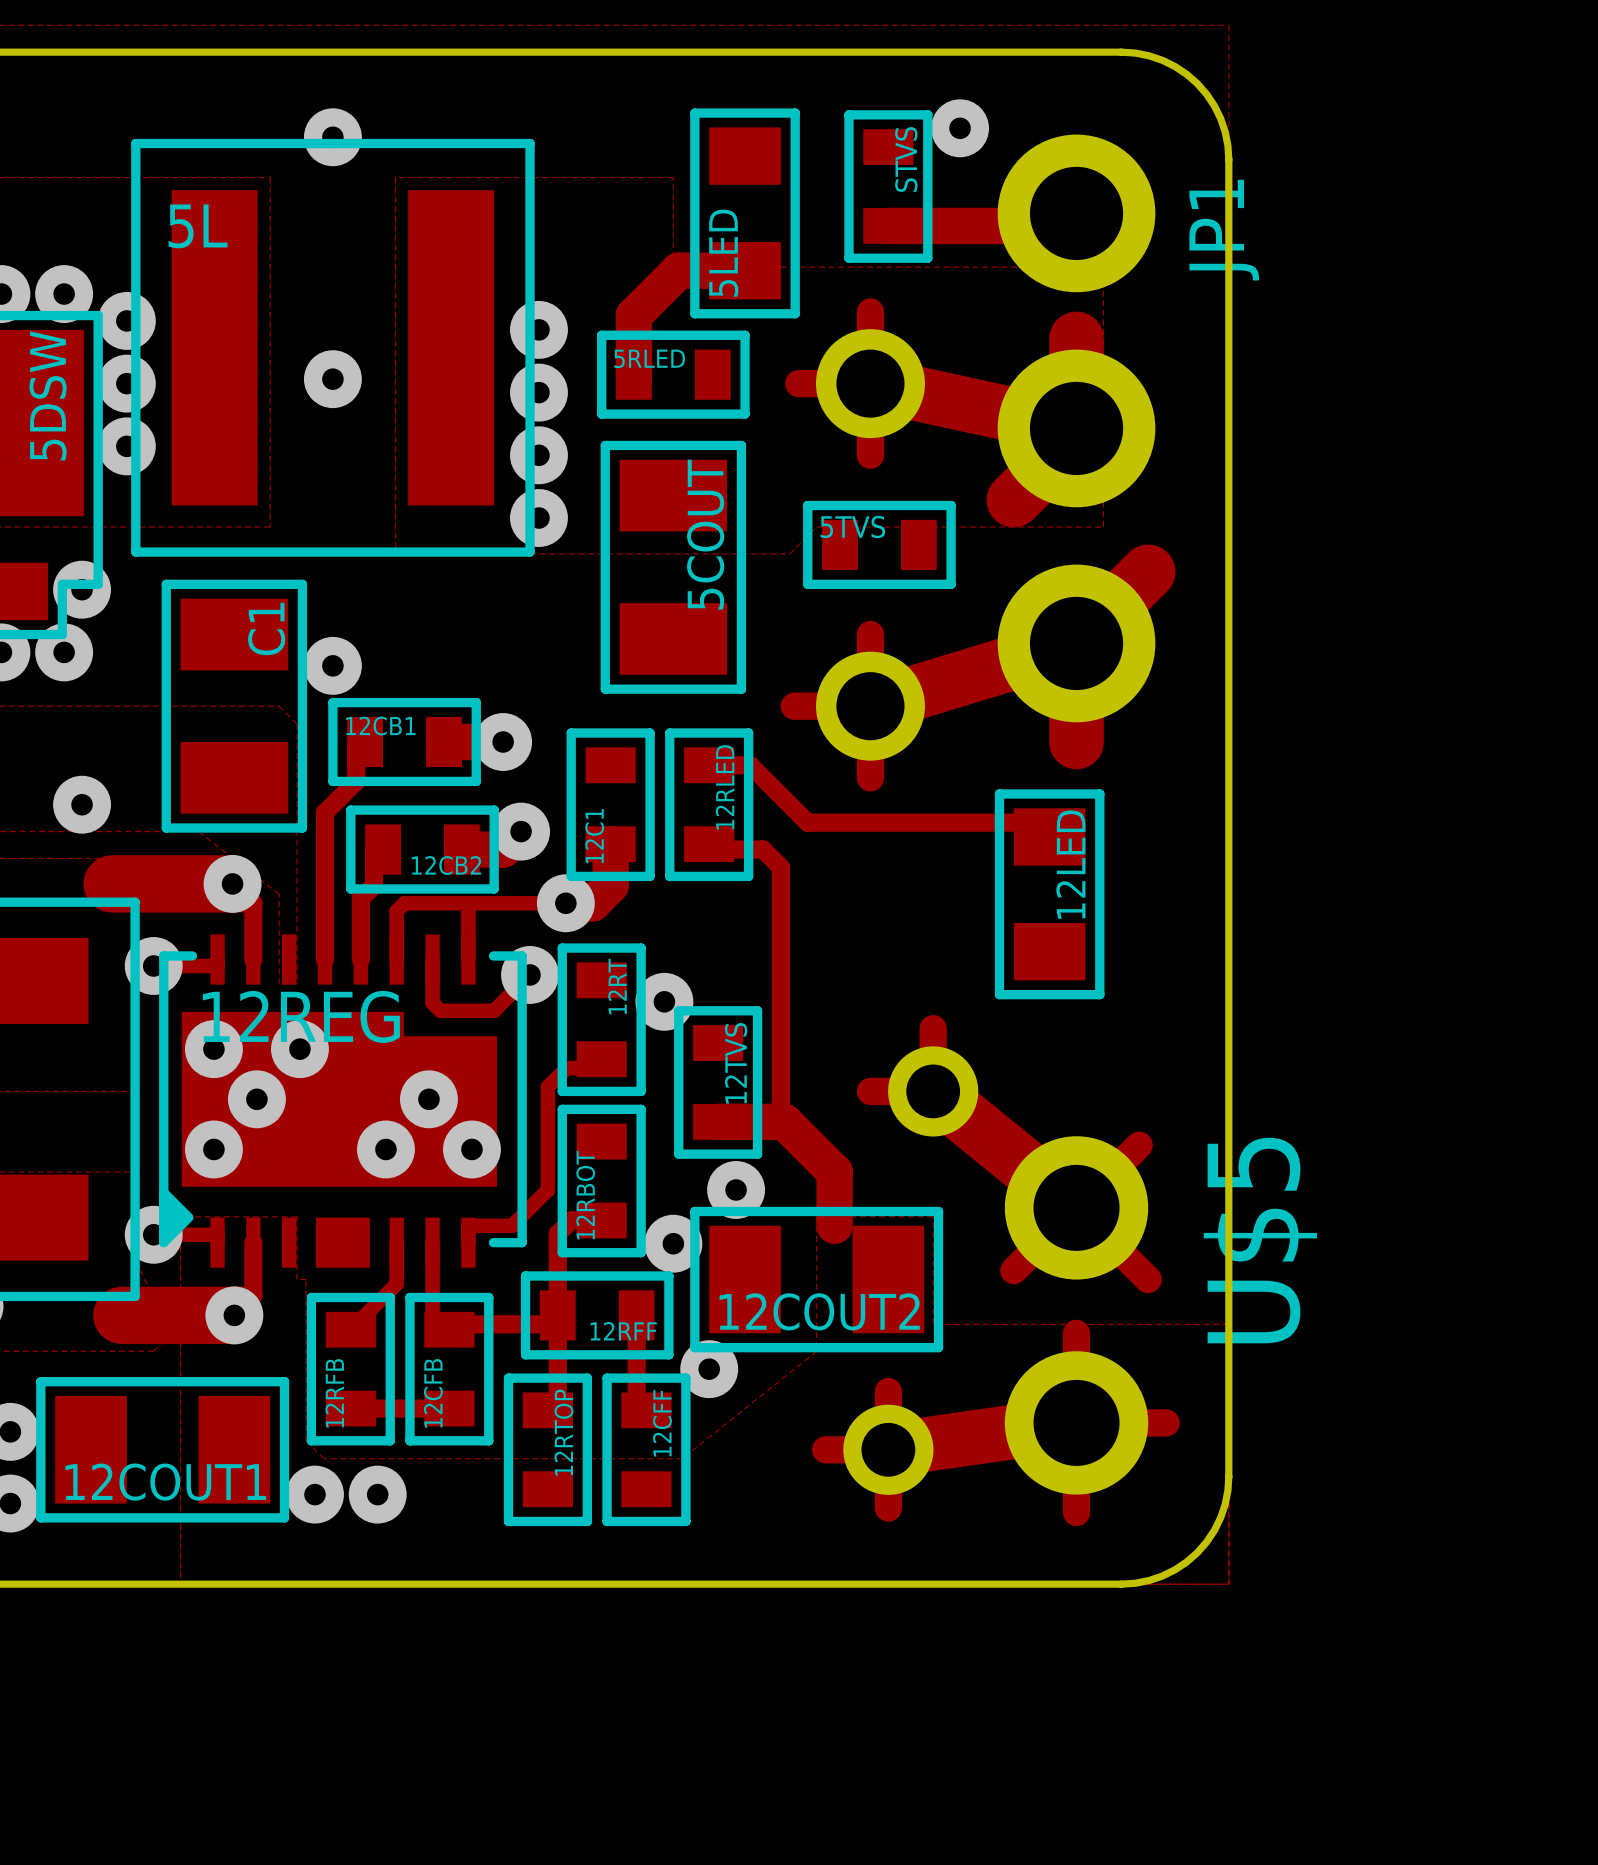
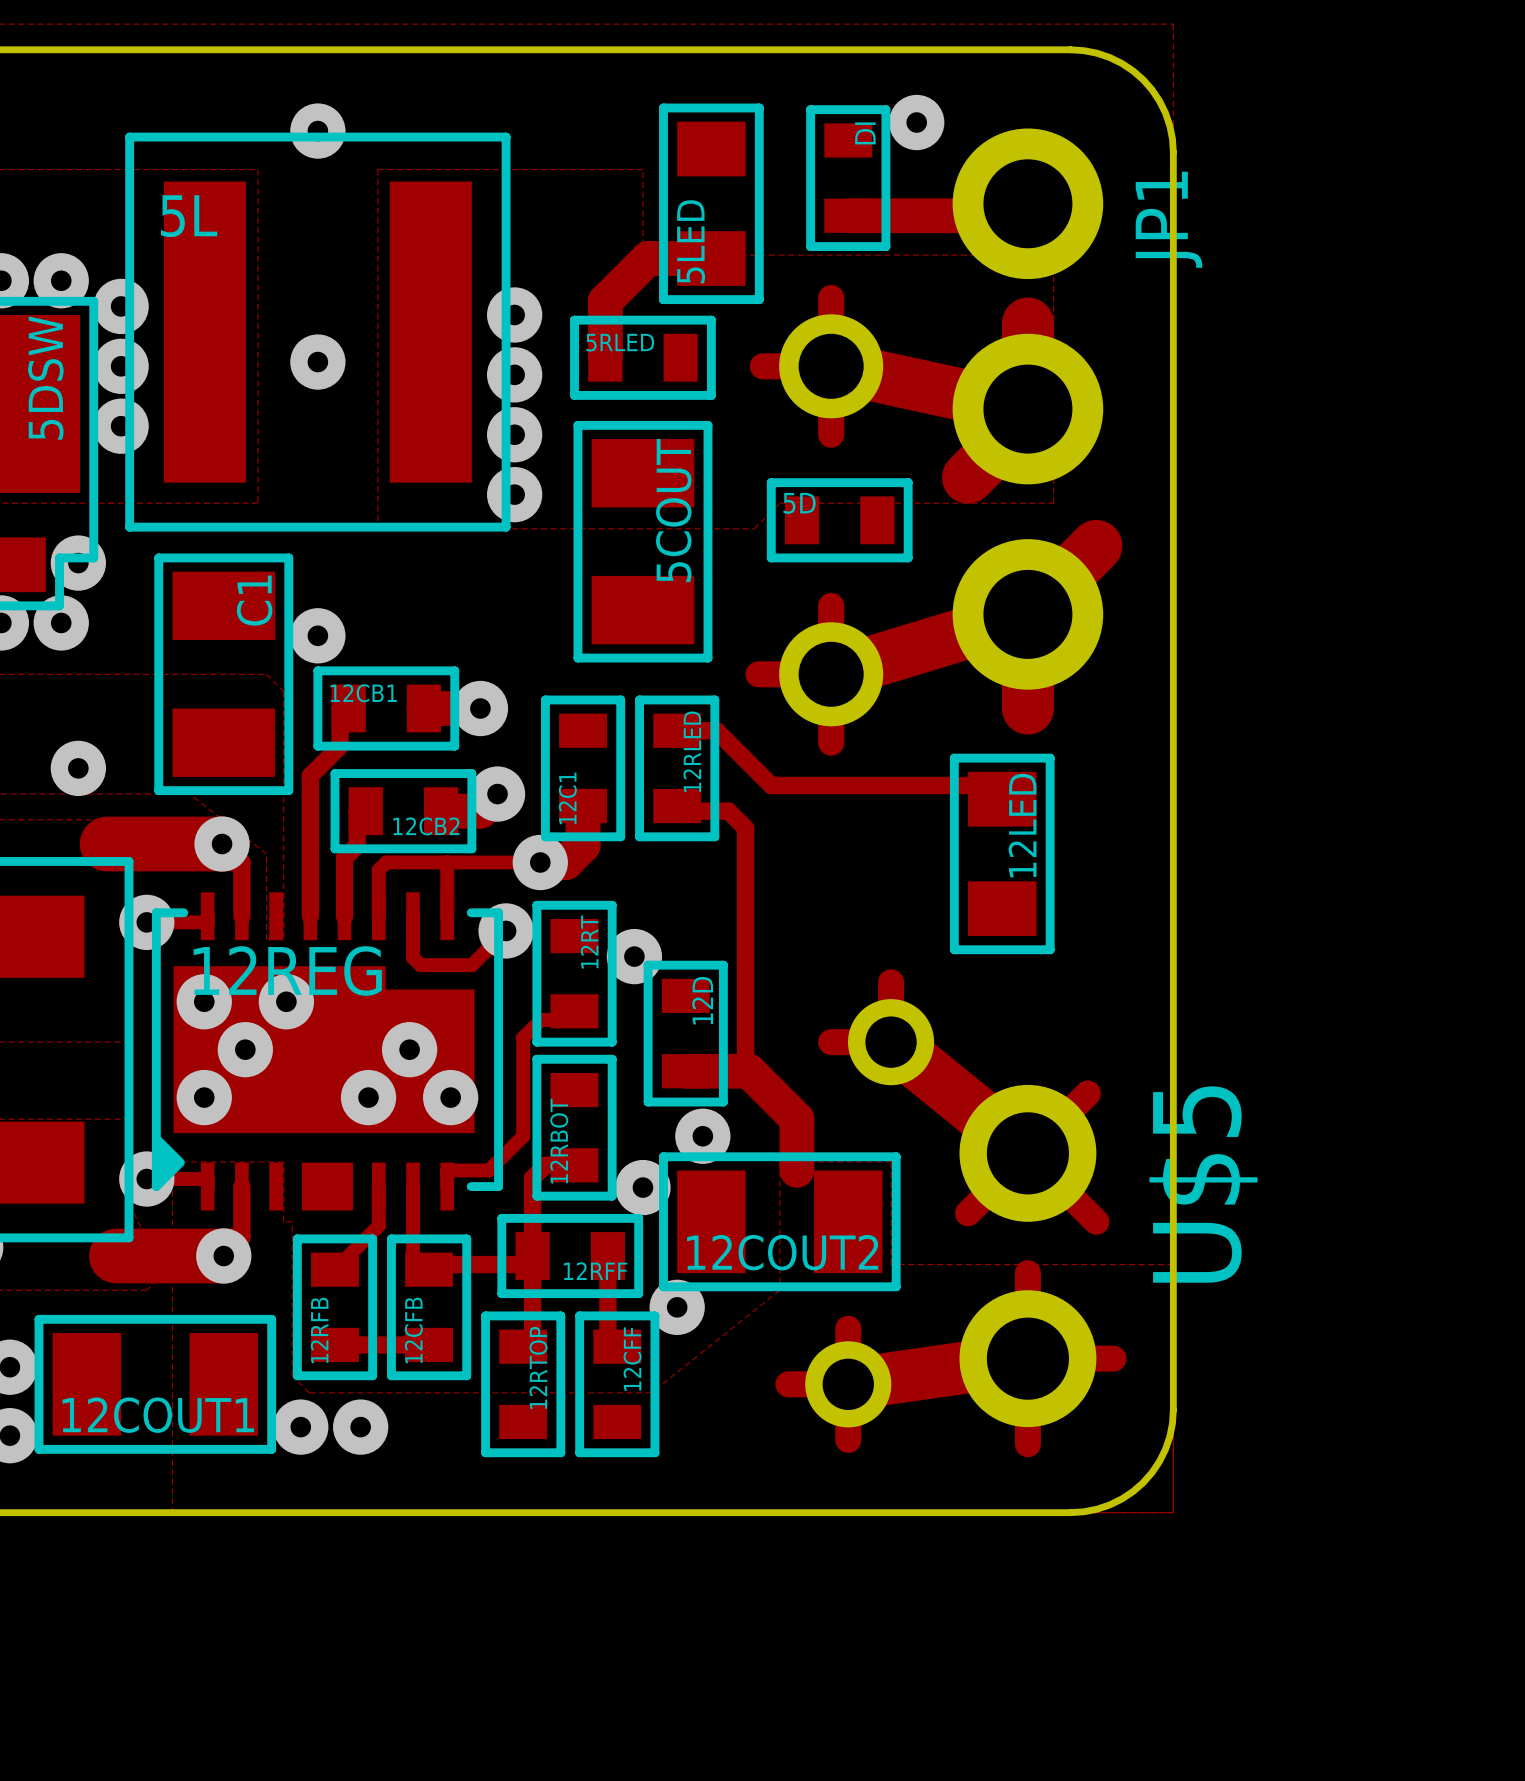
STVS name: STVS (906, 159) -> DI (865, 133)
5TVS name: 5TVS (852, 527) -> 5D (799, 503)
12TVS name: 12TVS (736, 1063) -> 12D (702, 1000)

